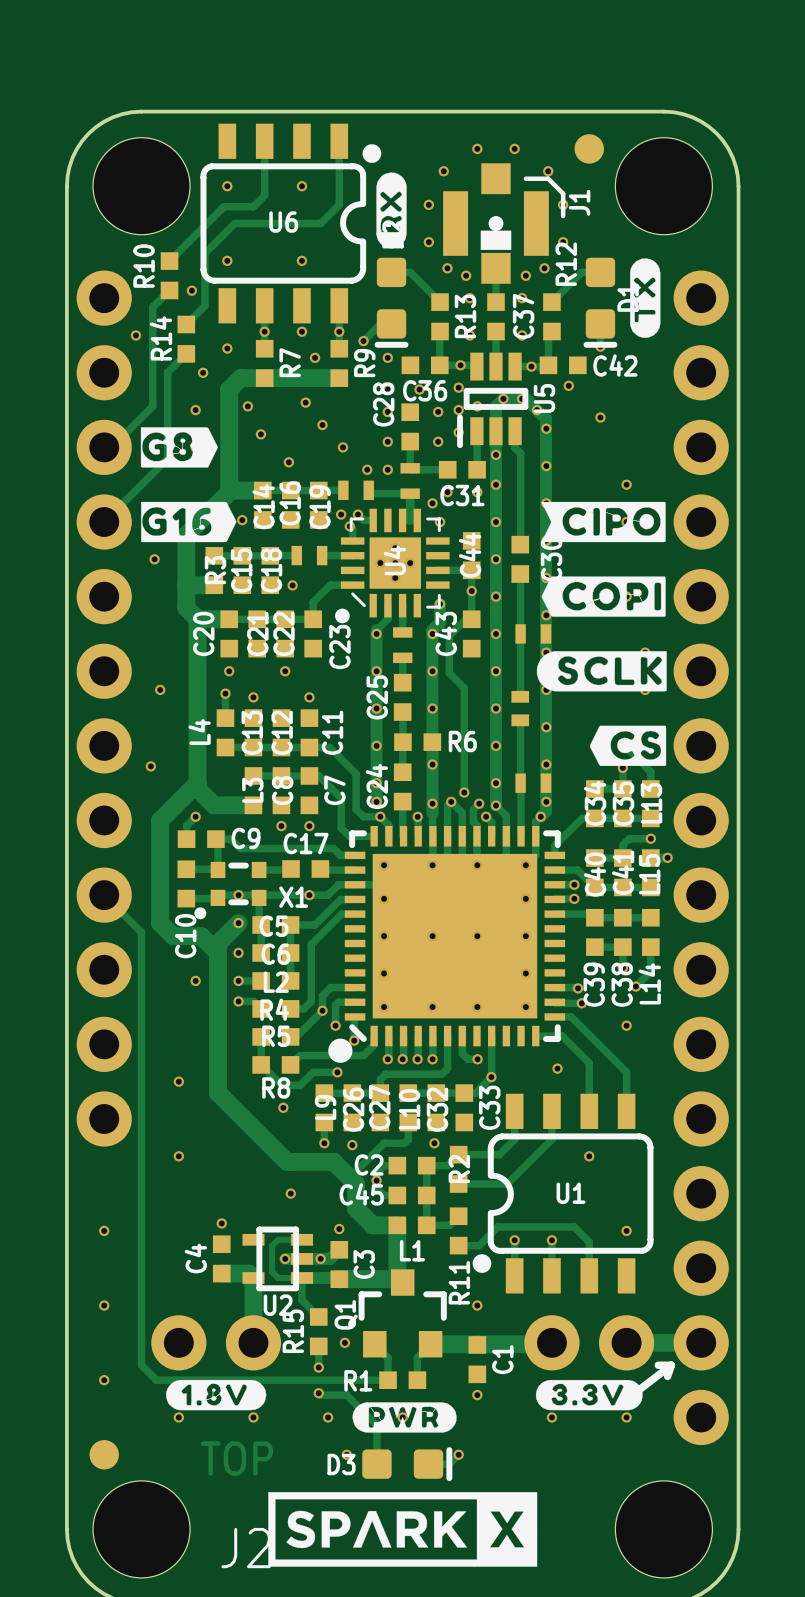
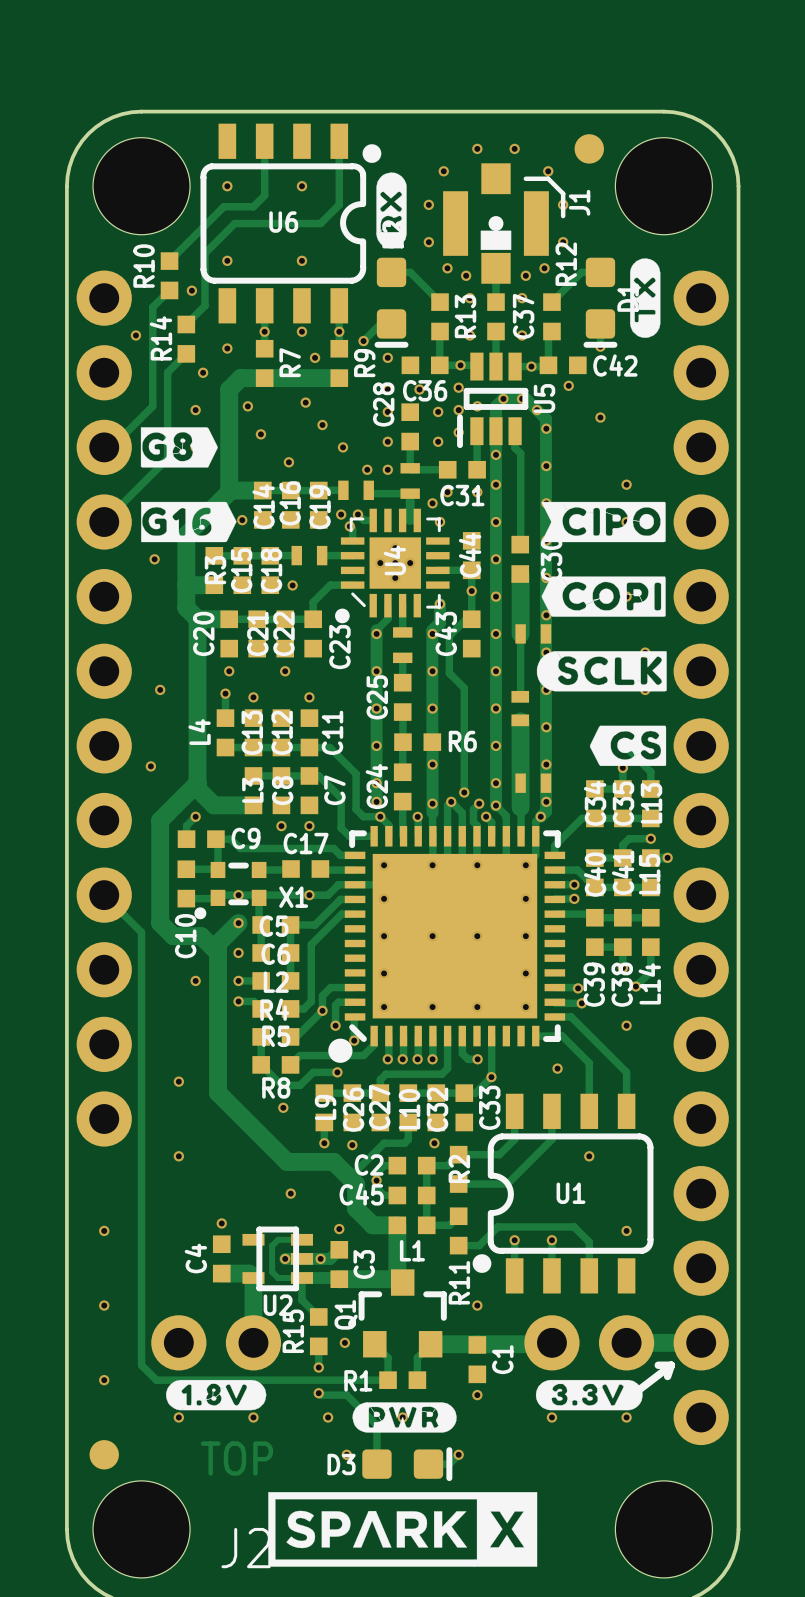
track width: thin (520, 574) (520, 633) -> thick (520, 574) (520, 633)

